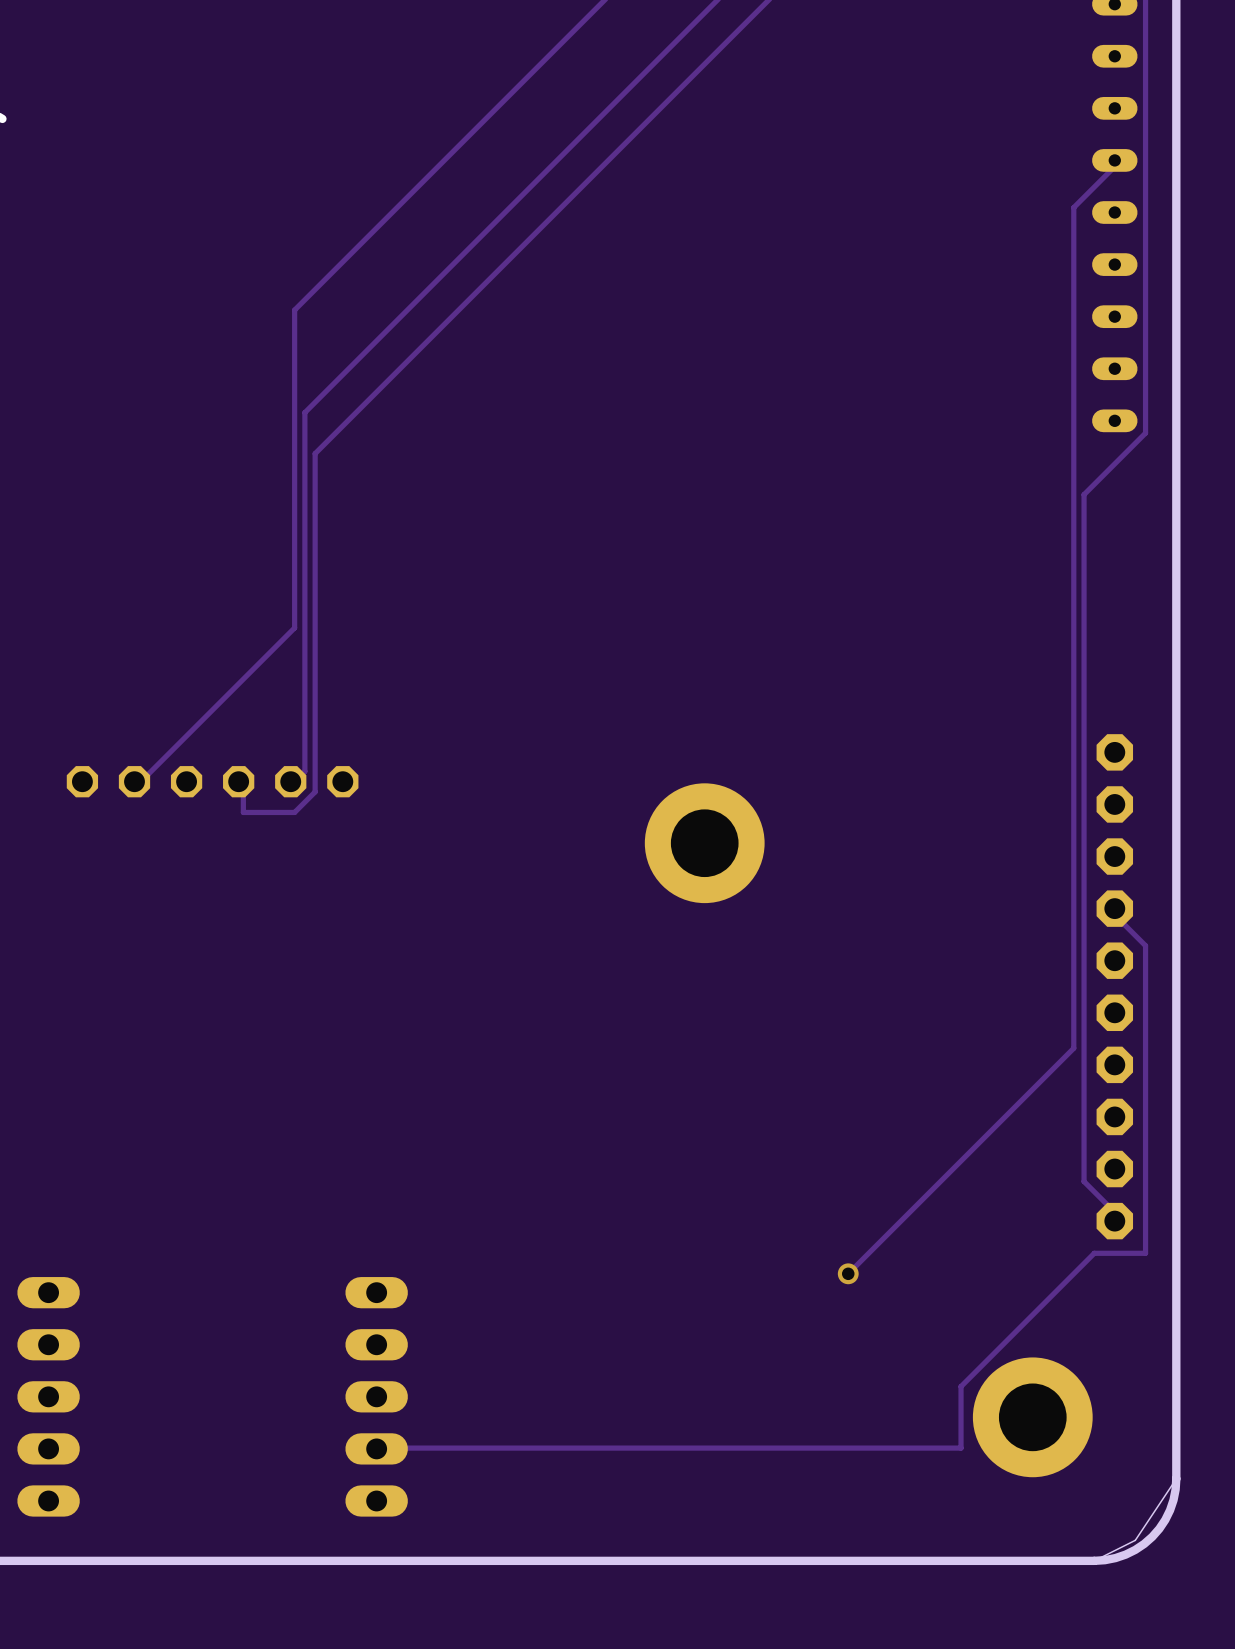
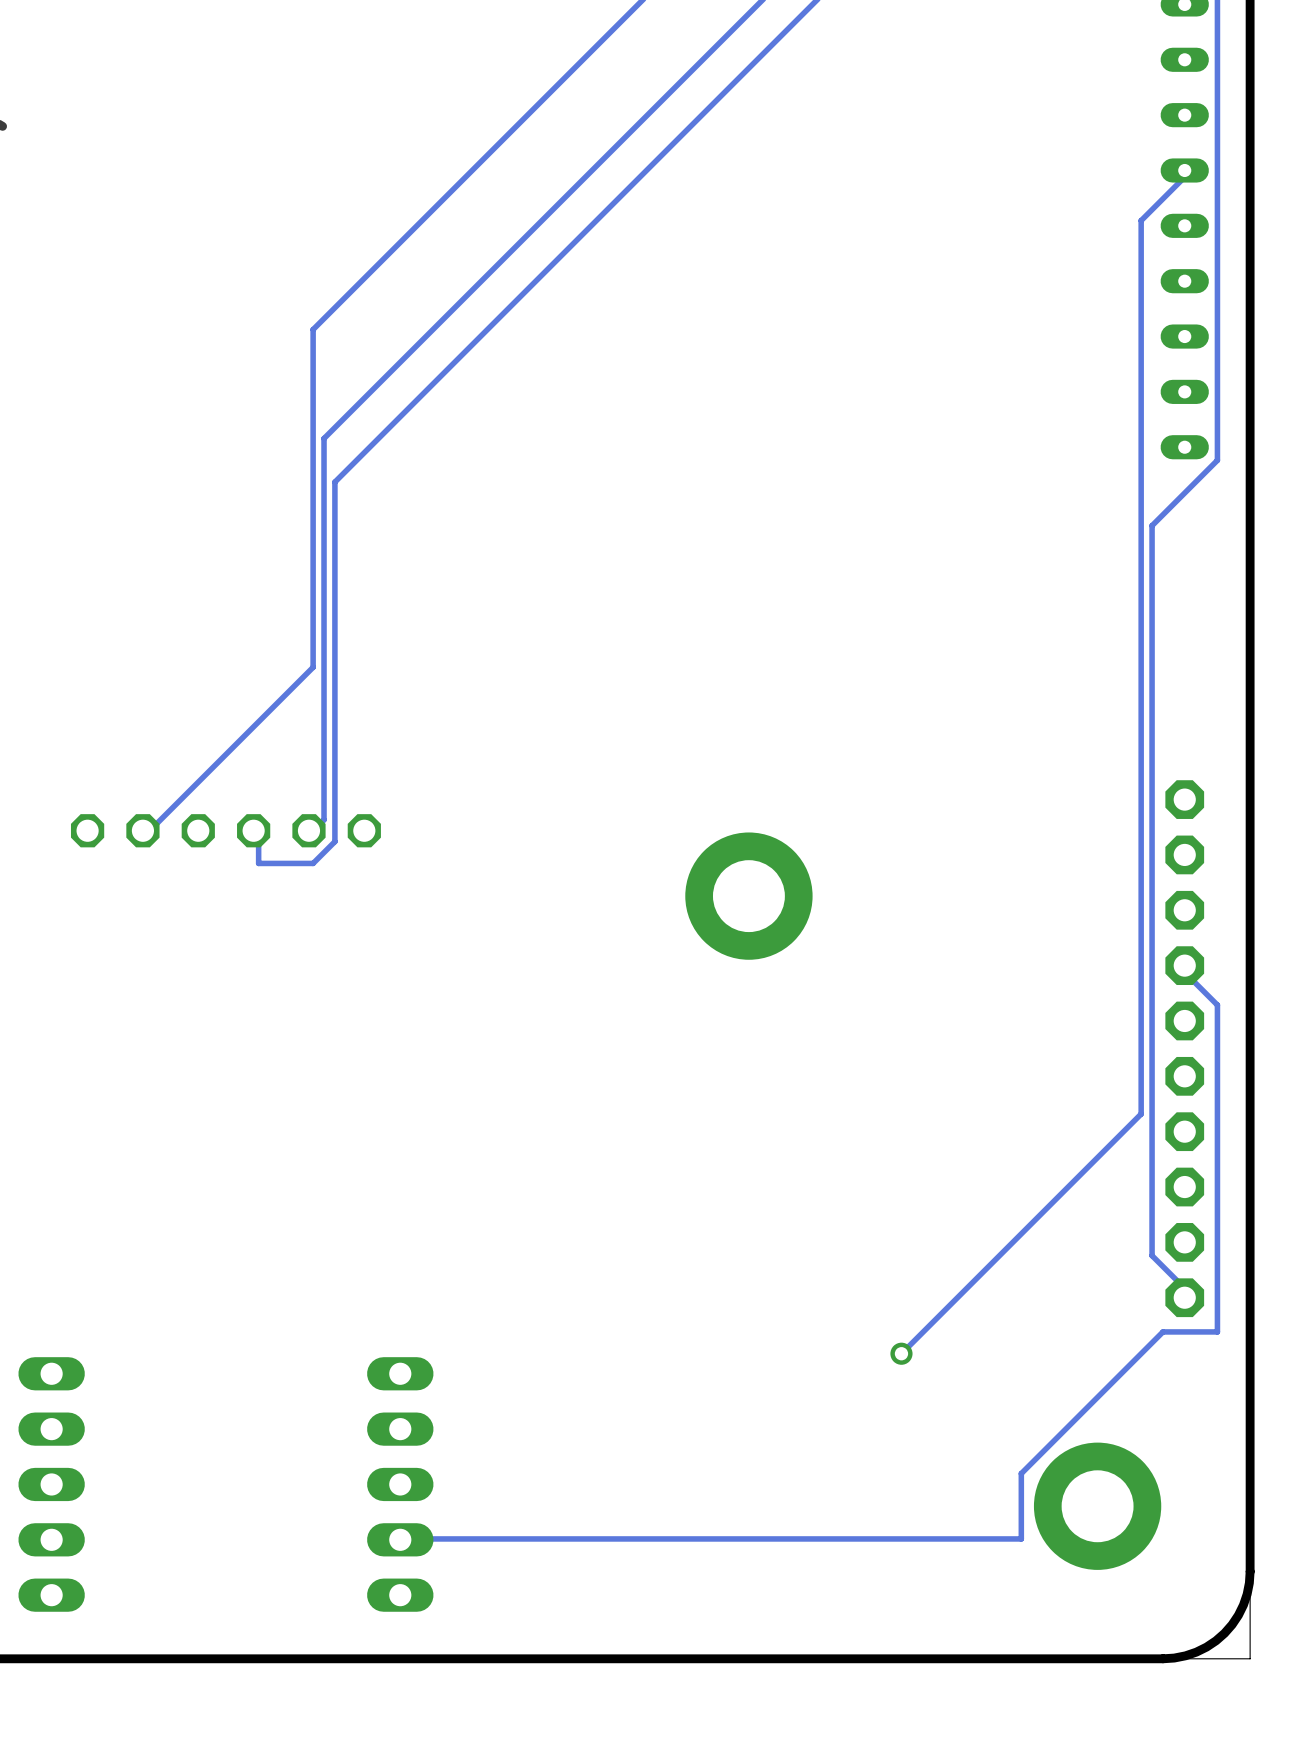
board edge: (1176, 1478) (1135, 1540) (1094, 1560) -> (1250, 1571) (1250, 1658) (1162, 1658)

